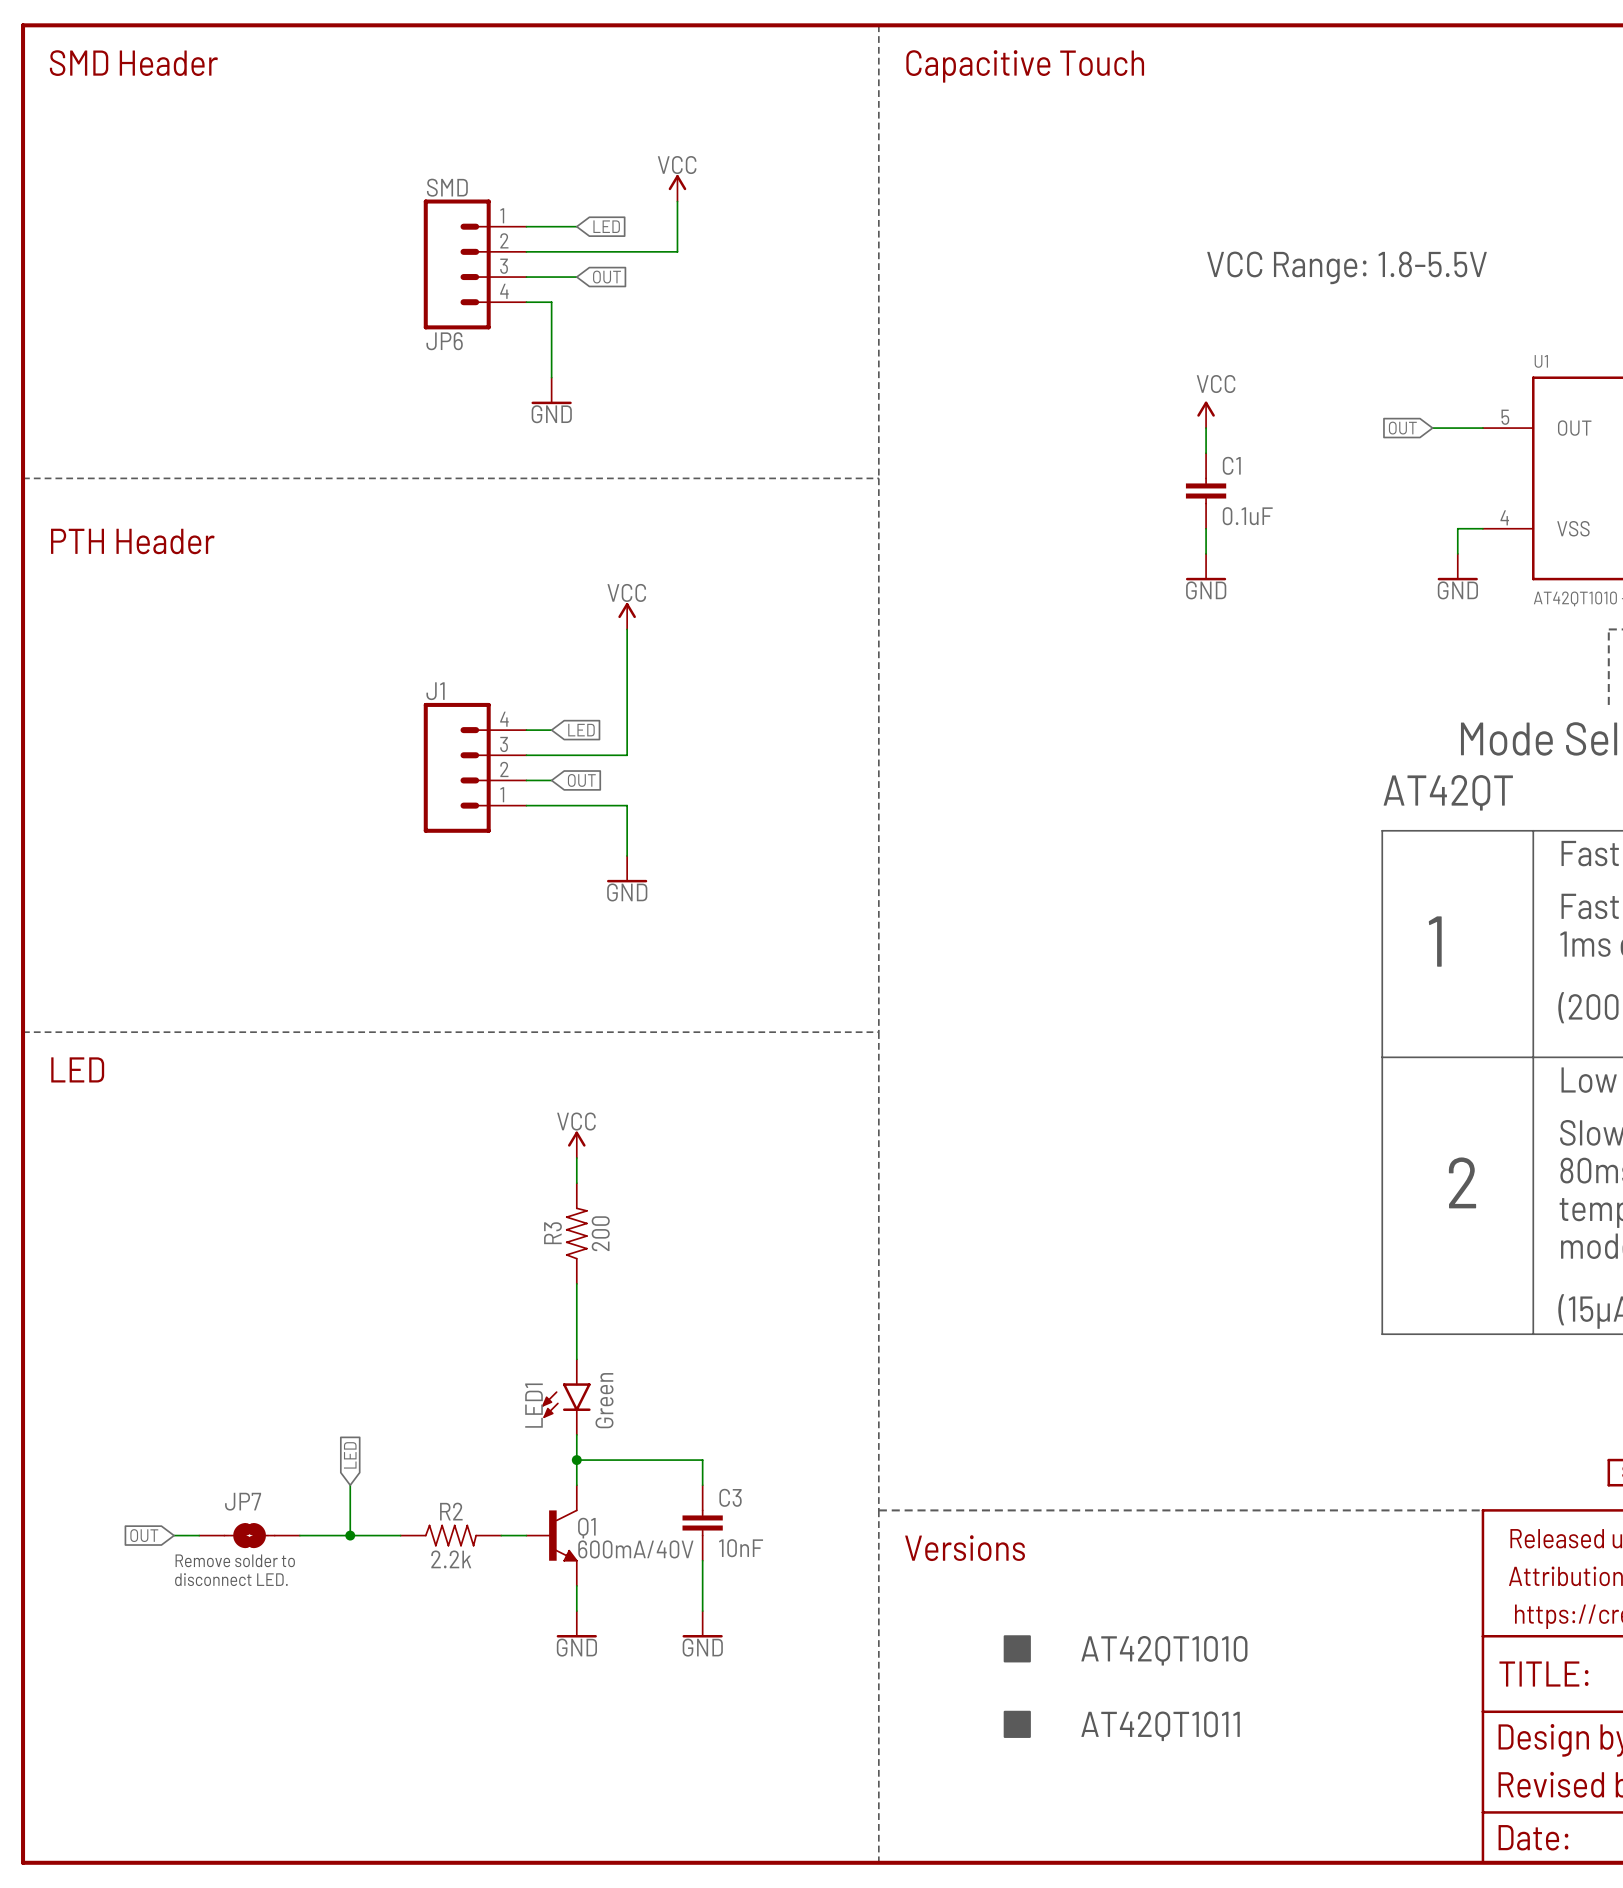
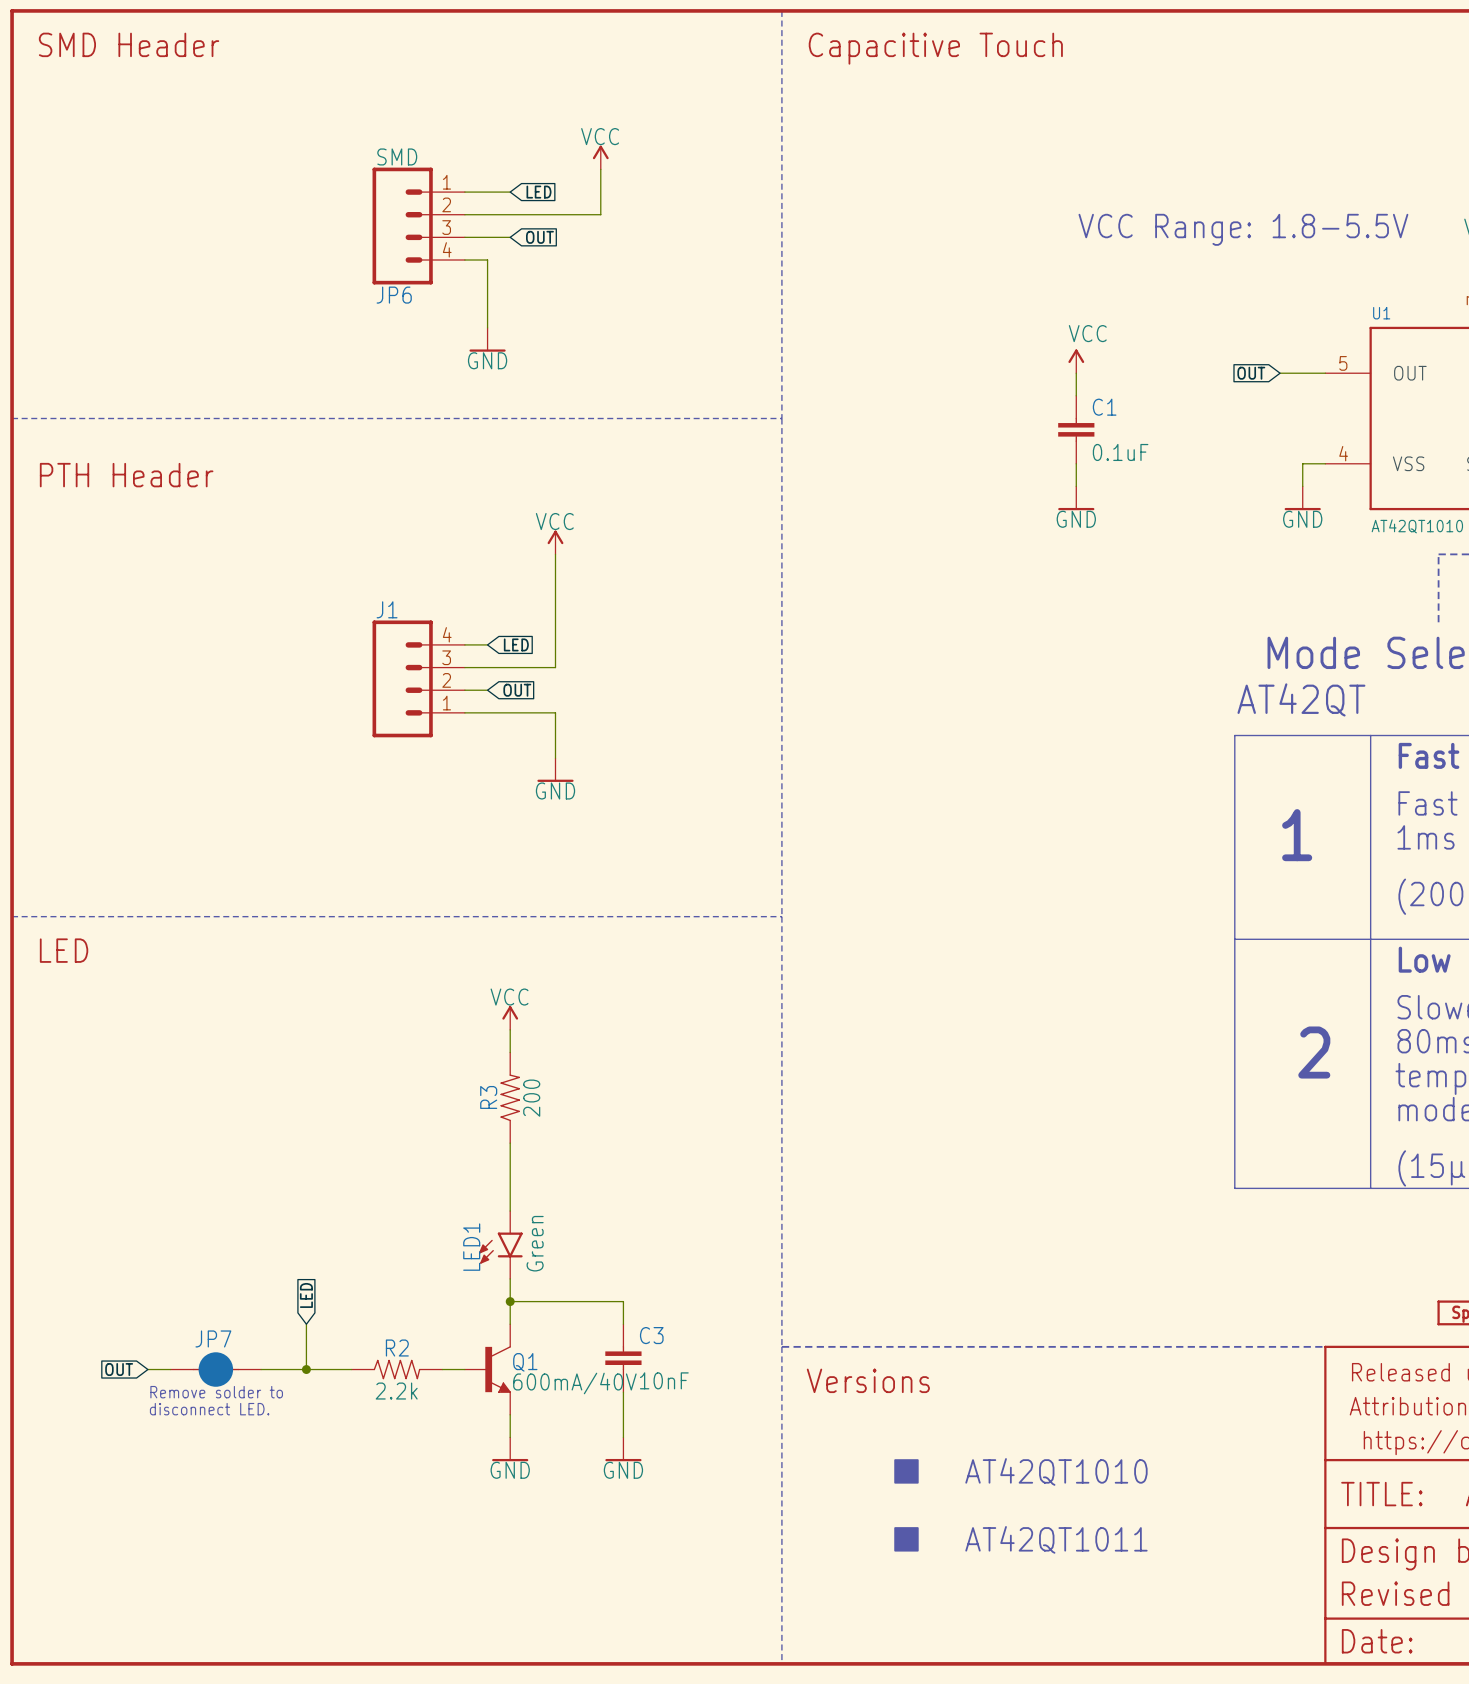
JP7 symbol: [199, 1522, 300, 1549] -> [170, 1352, 262, 1387]

